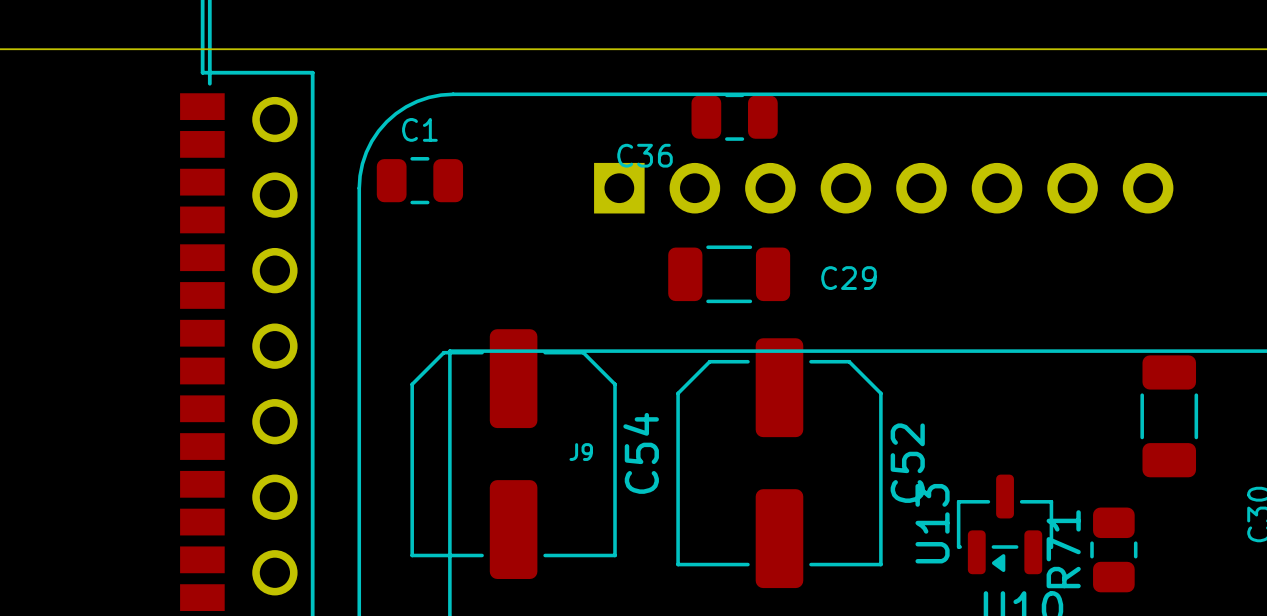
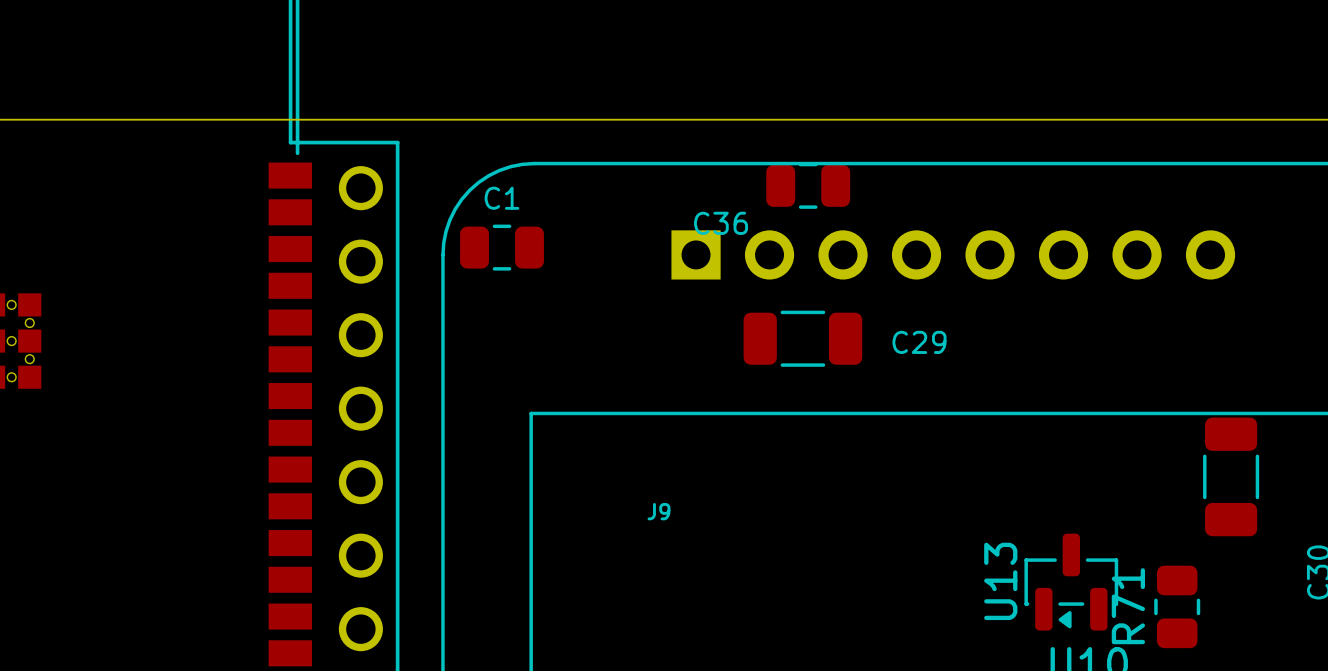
C54: (513, 454) -> none
C52: (779, 463) -> none

